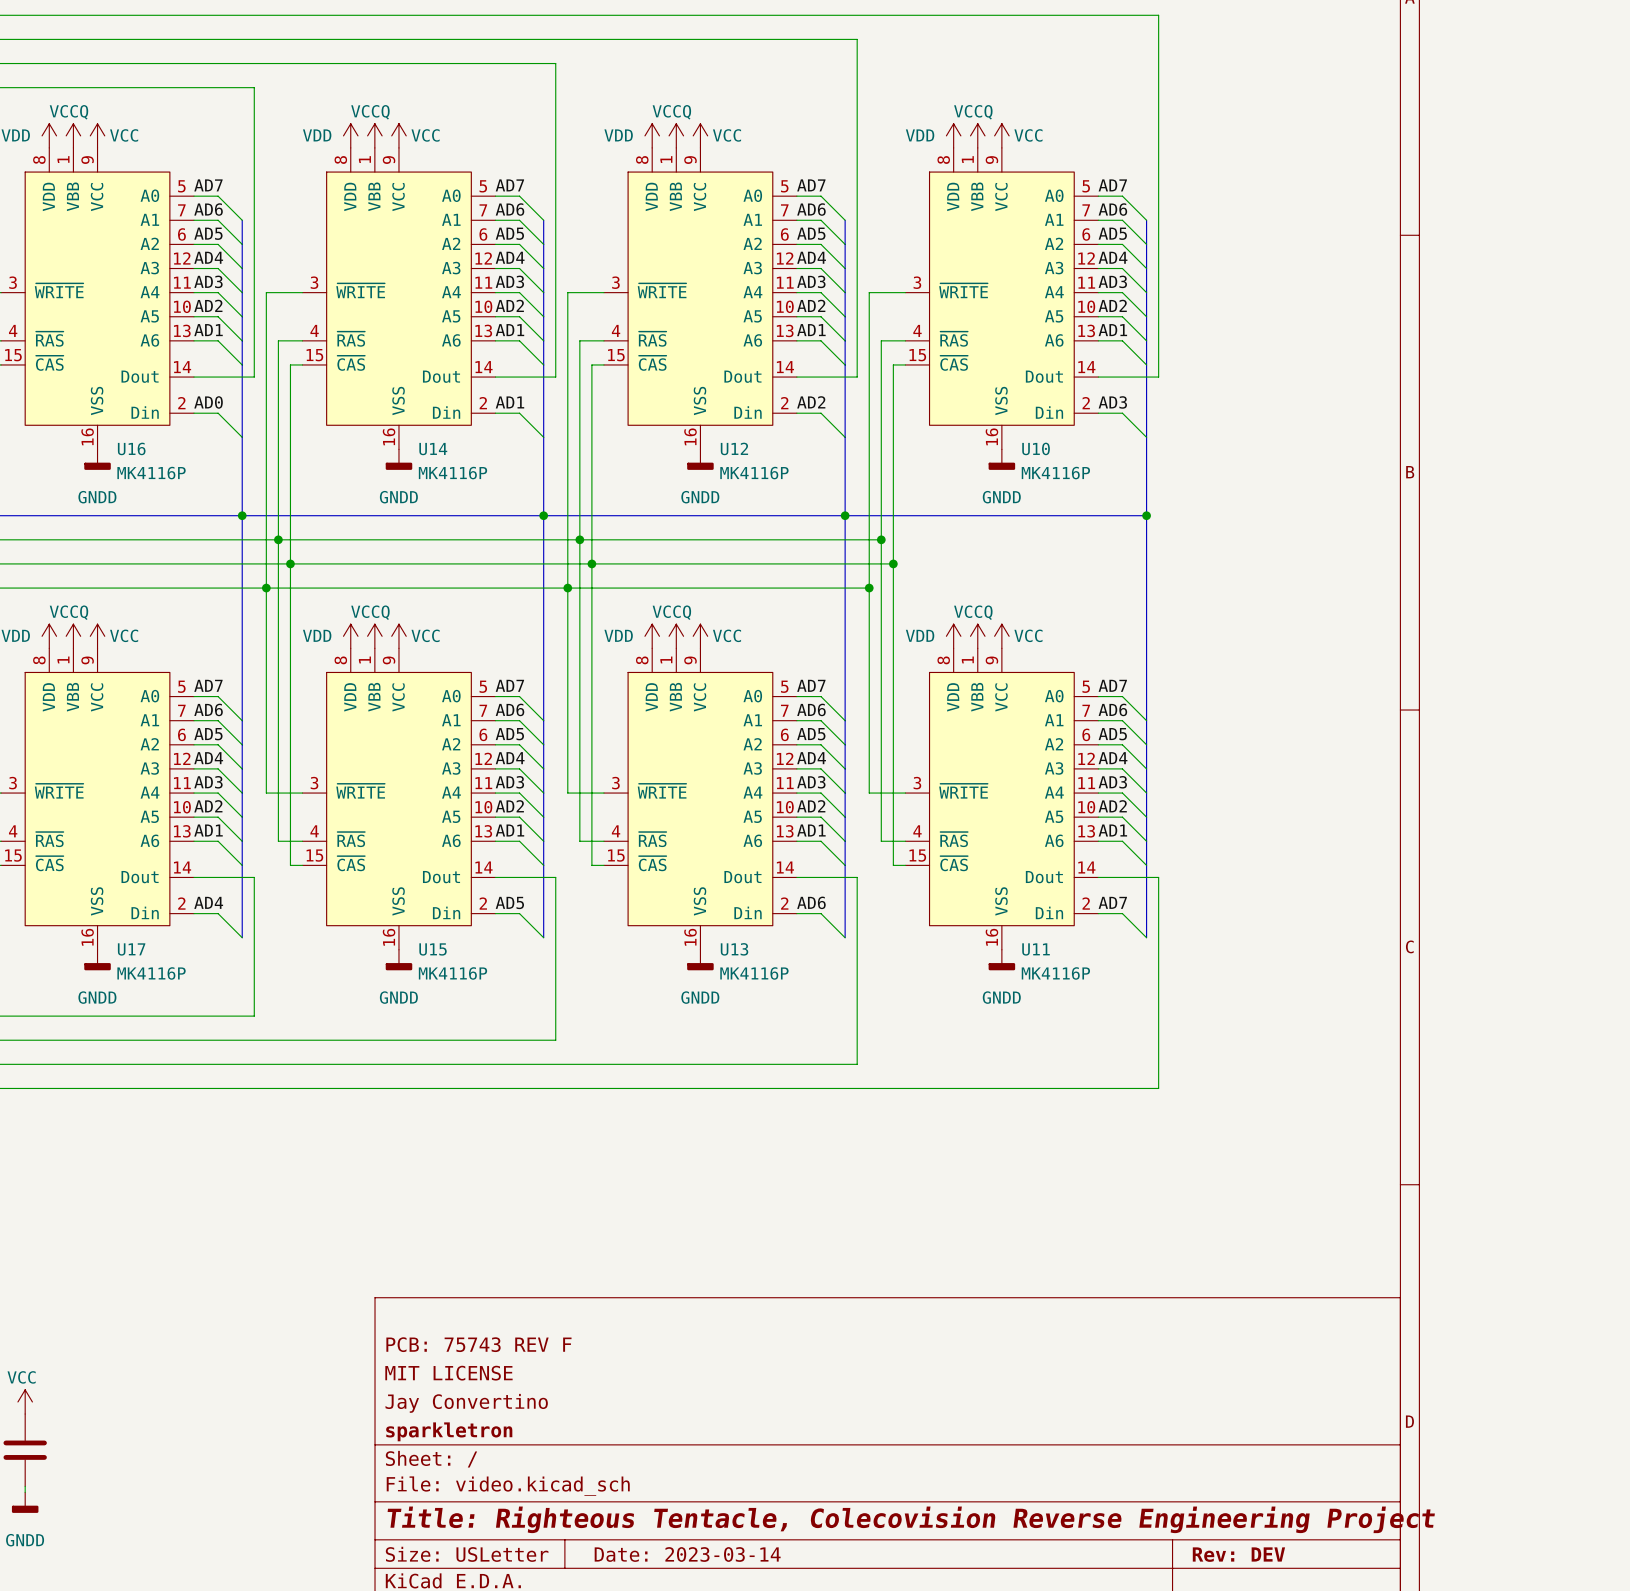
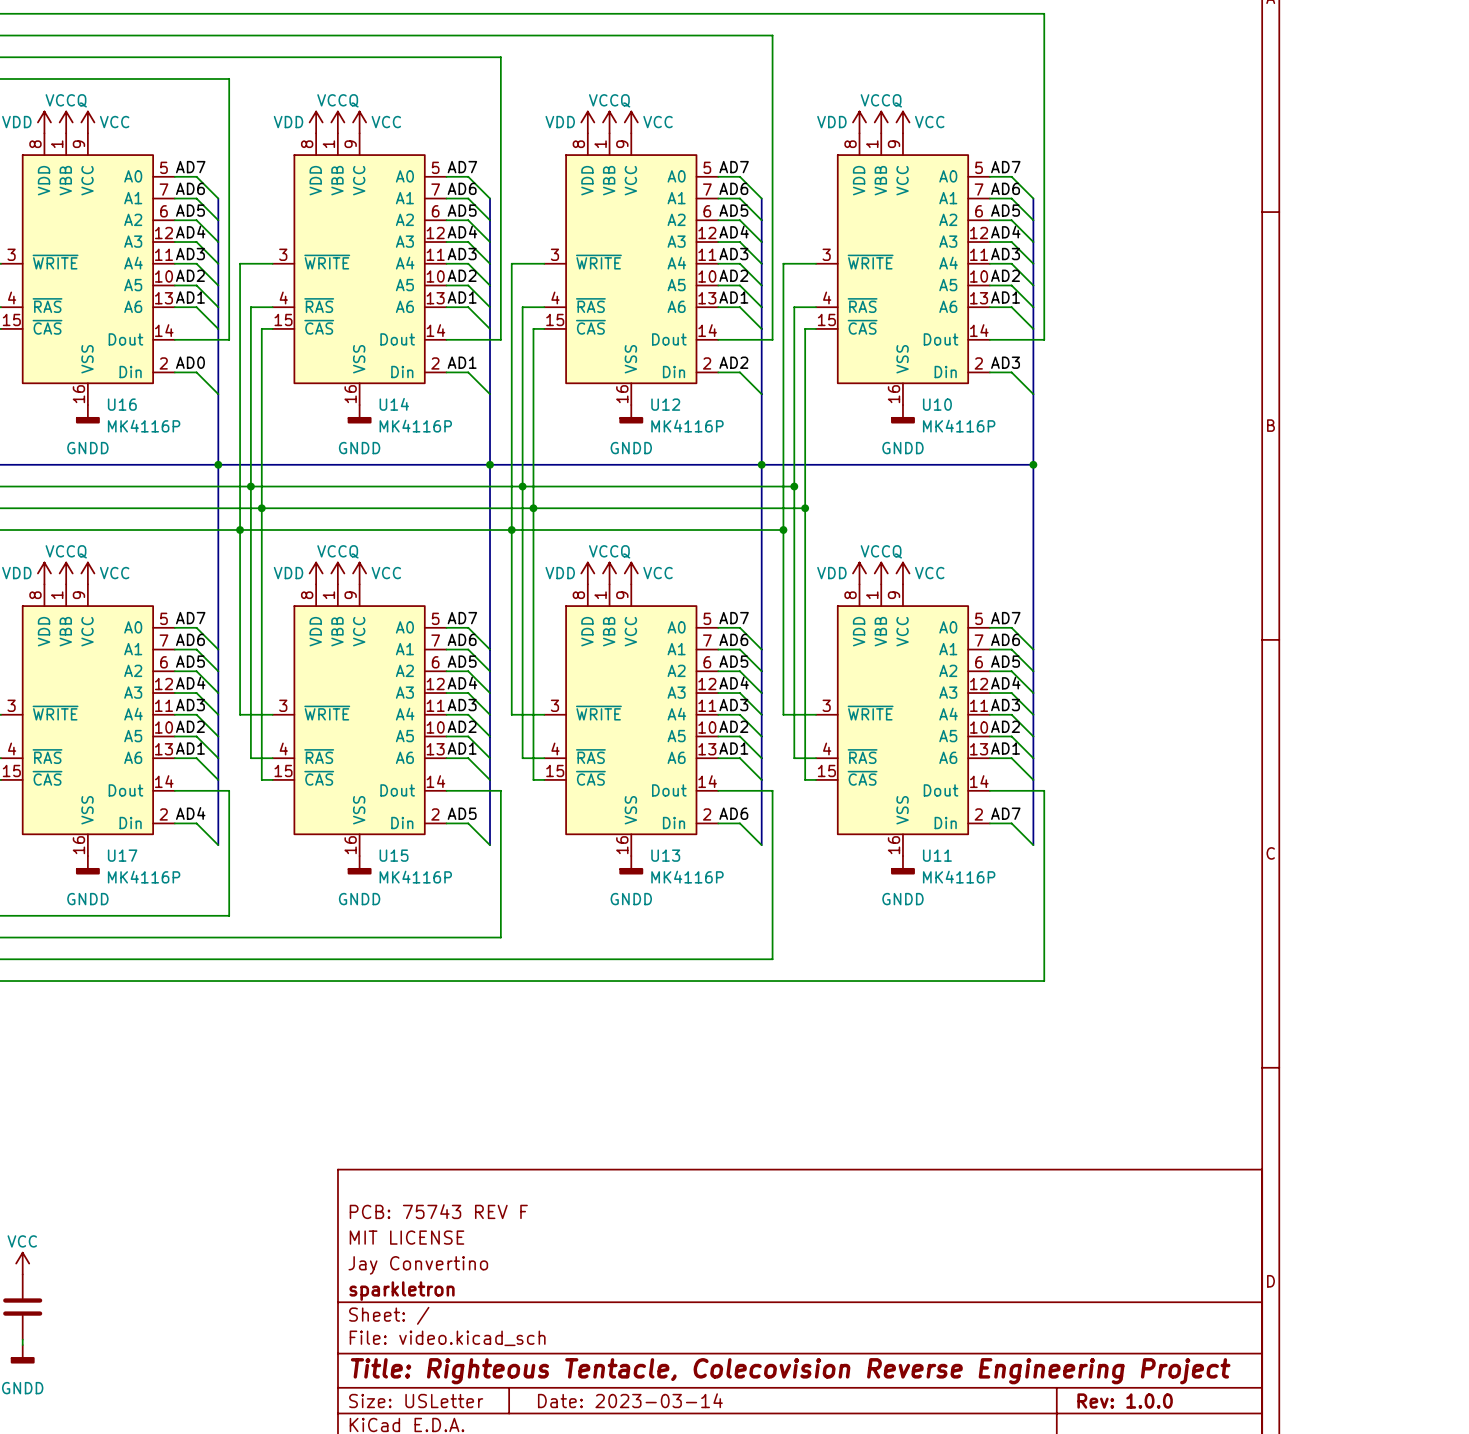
title block: Rev: DEV (1238, 1554) -> Rev: 1.0.0 (1125, 1401)

